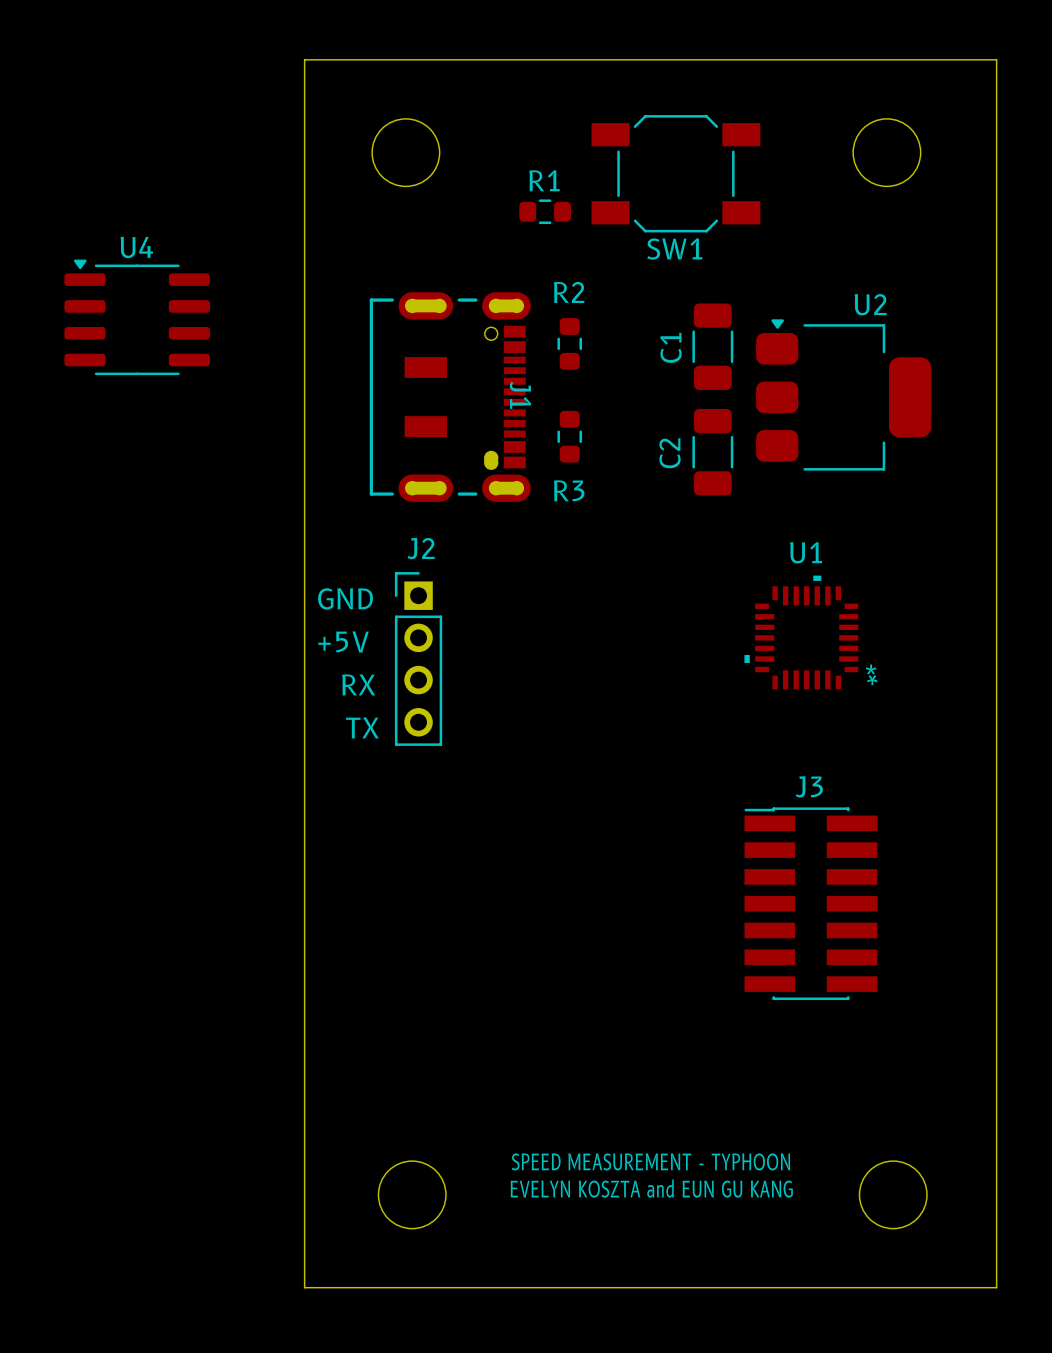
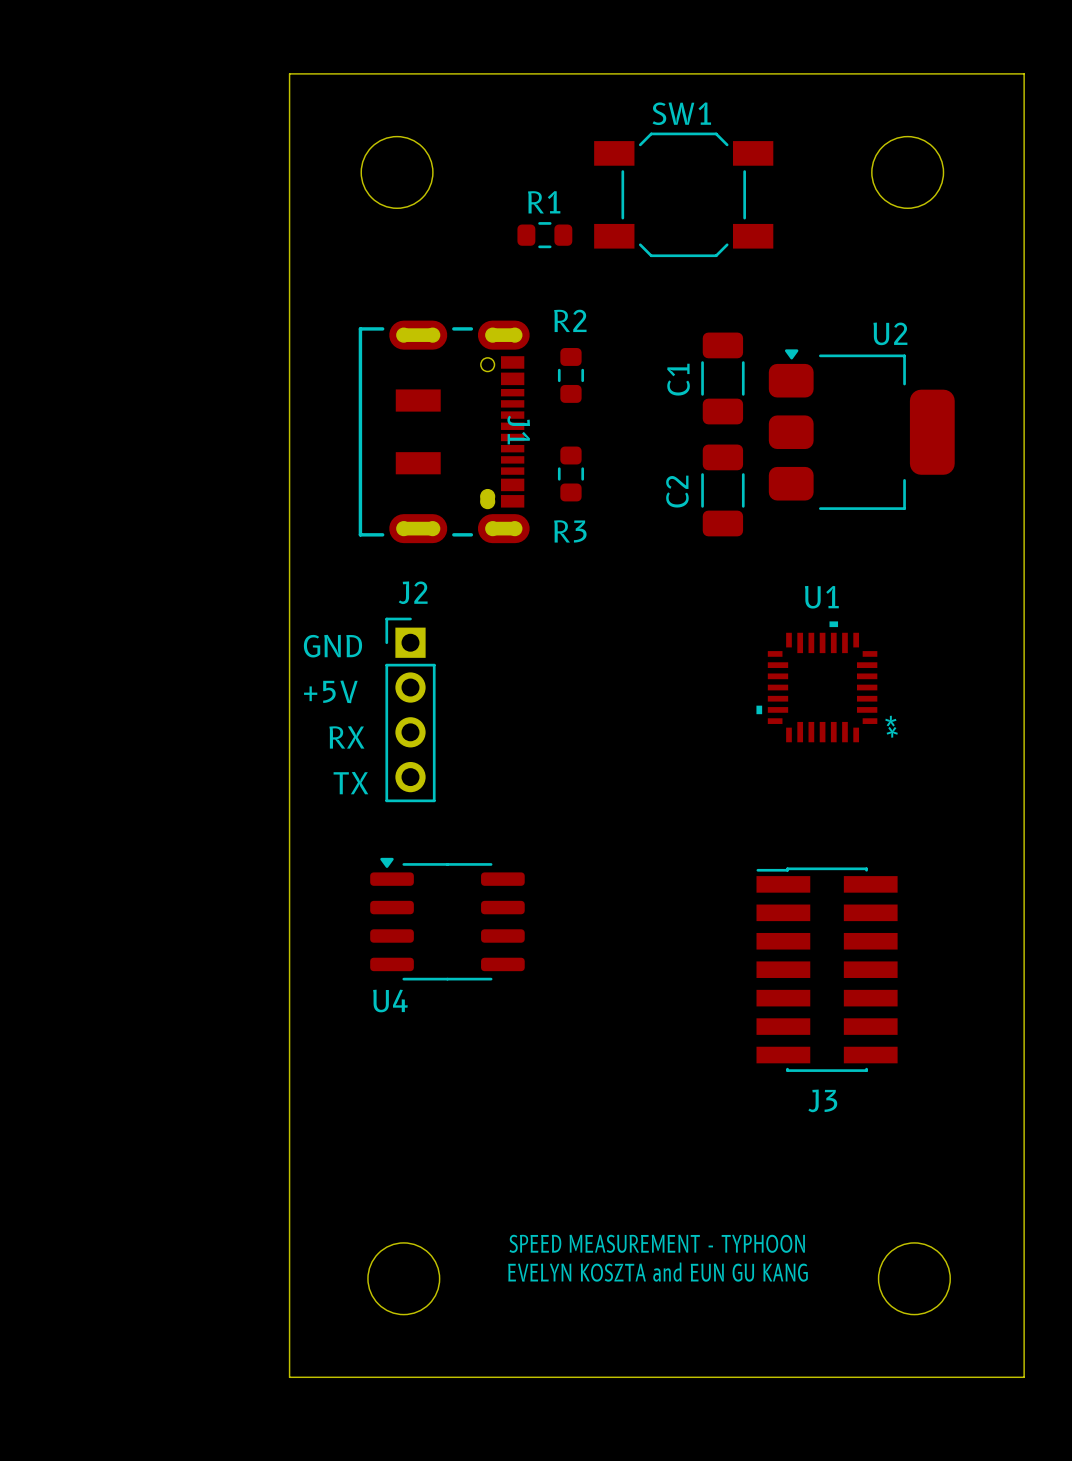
U4 name position: U4 (136, 247) -> U4 (390, 1001)
SW1 name position: SW1 (674, 249) -> SW1 (681, 113)
U4 position: (137, 317) -> (447, 919)
J3 name position: J3 (809, 786) -> J3 (822, 1100)

